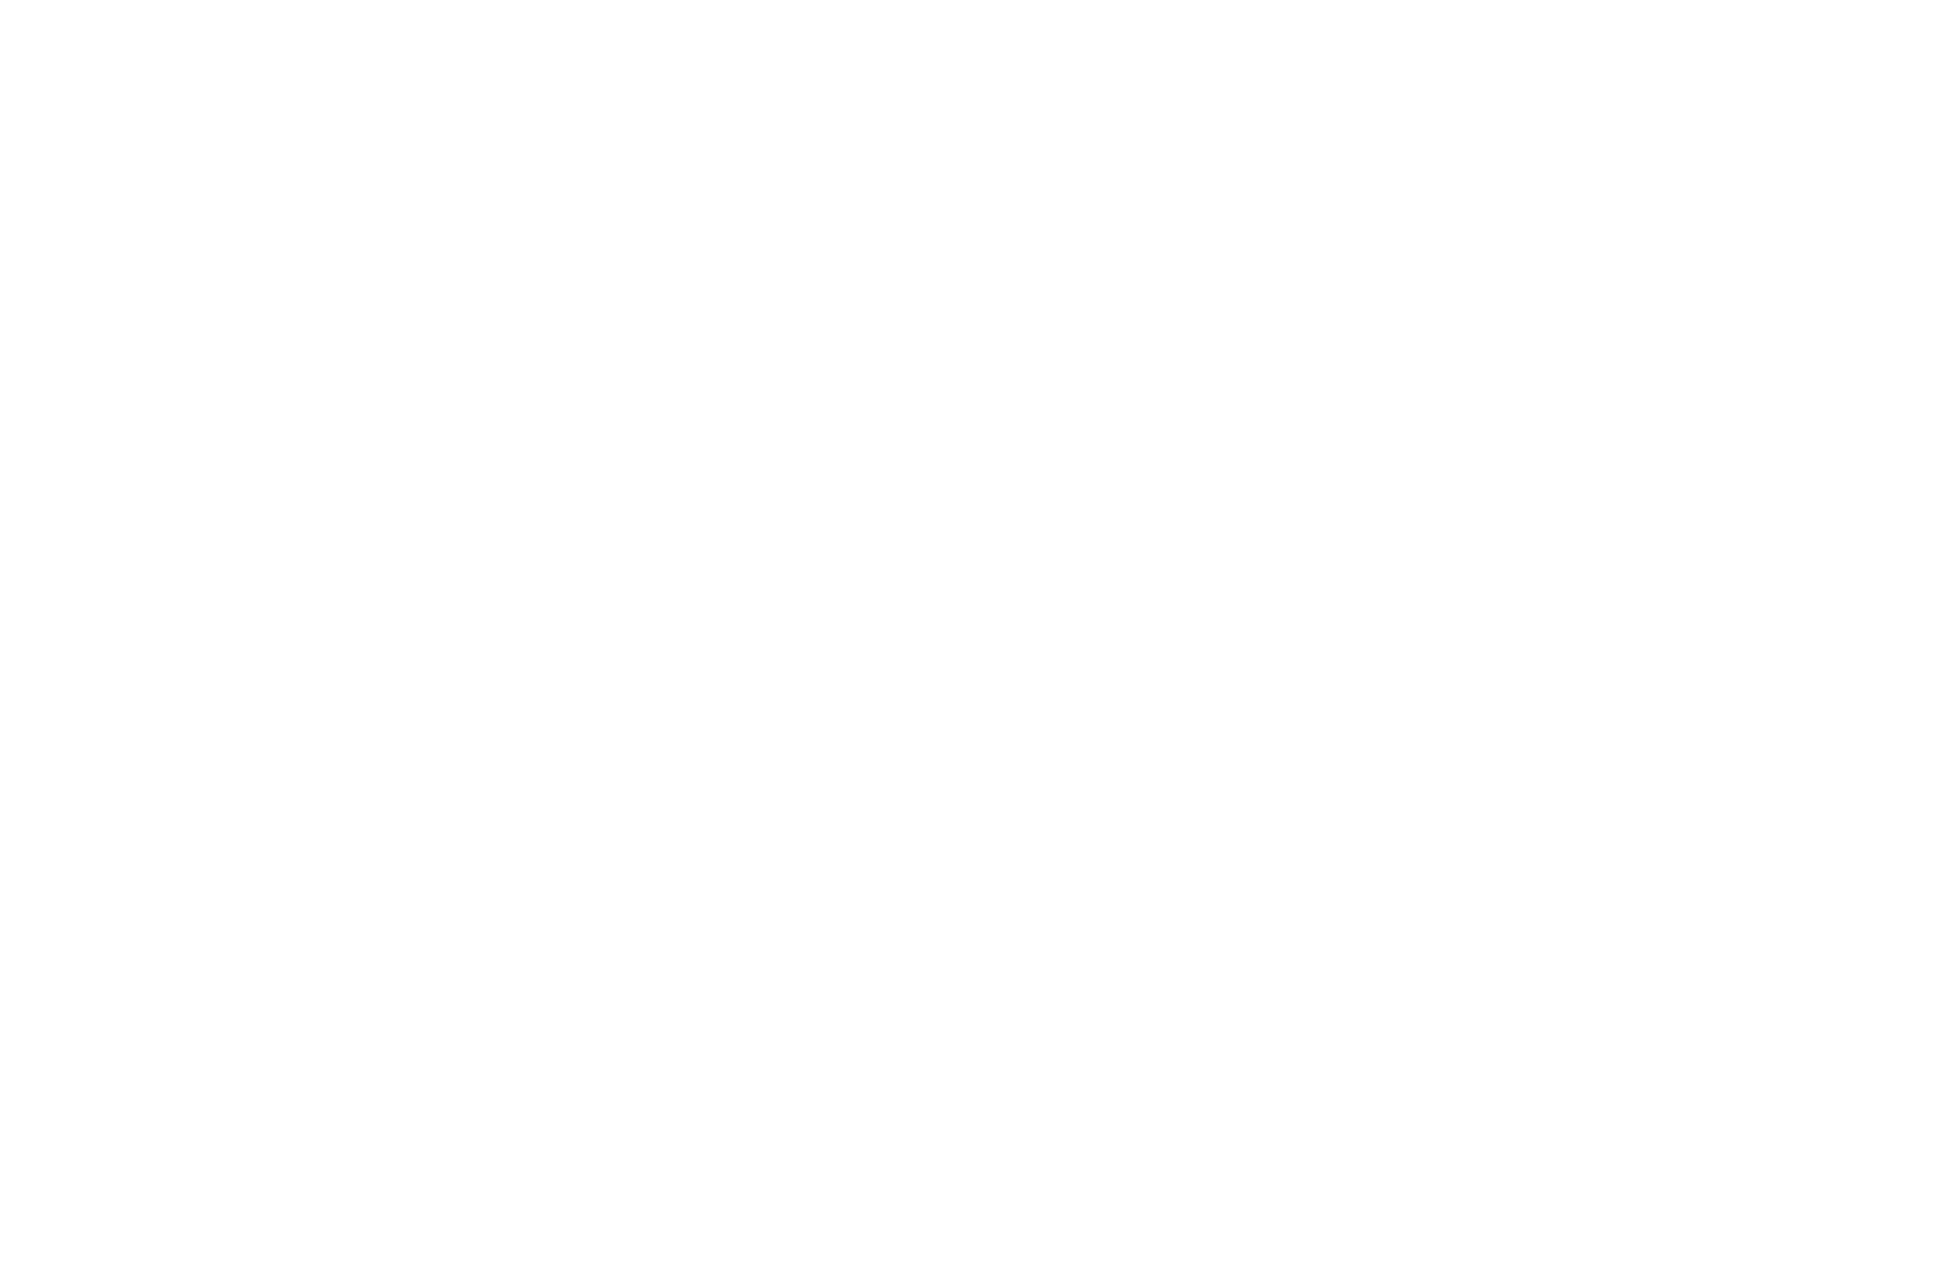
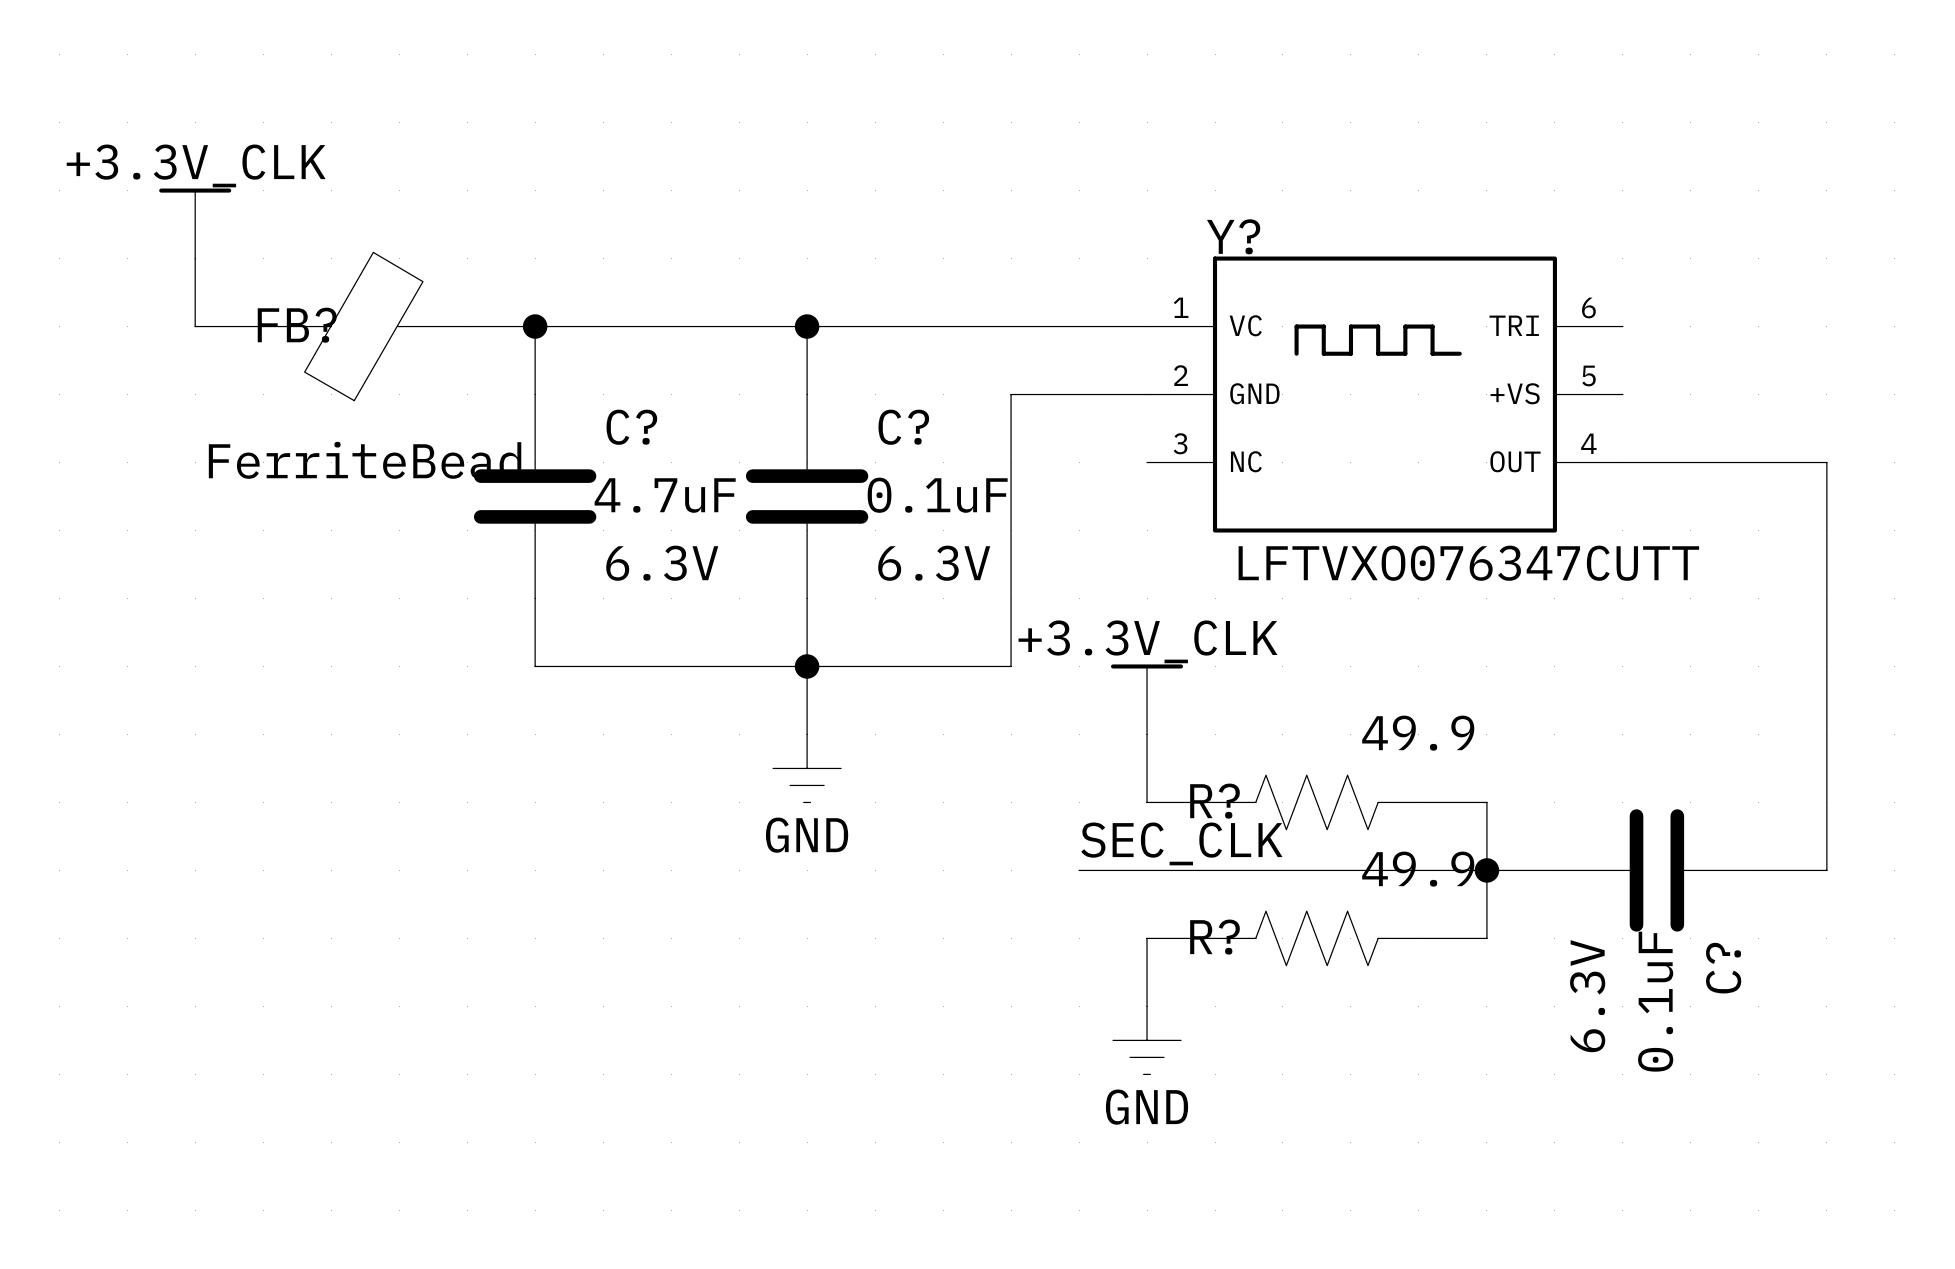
power symbol: none -> +3.3V_CLK (195, 223)
wire: none -> (195, 258) (195, 326) (263, 326)
FB?: none -> FerriteBead (365, 326)
wire: none -> (467, 326) (1147, 326)
wire: none -> (535, 326) (535, 394)
junction: none -> (535, 326)
wire: none -> (807, 326) (807, 394)
junction: none -> (807, 326)
wire: none -> (1147, 394) (1011, 394) (1011, 666) (535, 666) (535, 598)
Y?: none -> LFTVXO076347CUTT (1384, 394)
wire: none -> (1622, 462) (1826, 462) (1826, 870) (1758, 870)
C?: none -> 4.7uF (535, 496)
C?: none -> 0.1uF (807, 496)
wire: none -> (807, 598) (807, 734)
junction: none -> (807, 666)
power symbol: none -> +3.3V_CLK (1147, 699)
wire: none -> (1147, 734) (1147, 802) (1215, 802)
power symbol: none -> GND (807, 768)
R?: none -> 49.9 (1316, 802)
wire: none -> (1418, 802) (1486, 802) (1486, 938) (1418, 938)
label: none -> SEC_CLK (1181, 843)
wire: none -> (1079, 870) (1554, 870)
junction: none -> (1486, 870)
C?: none -> 0.1uF (1656, 870)
wire: none -> (1215, 938) (1147, 938) (1147, 1006)
R?: none -> 49.9 (1316, 938)
power symbol: none -> GND (1147, 1040)

